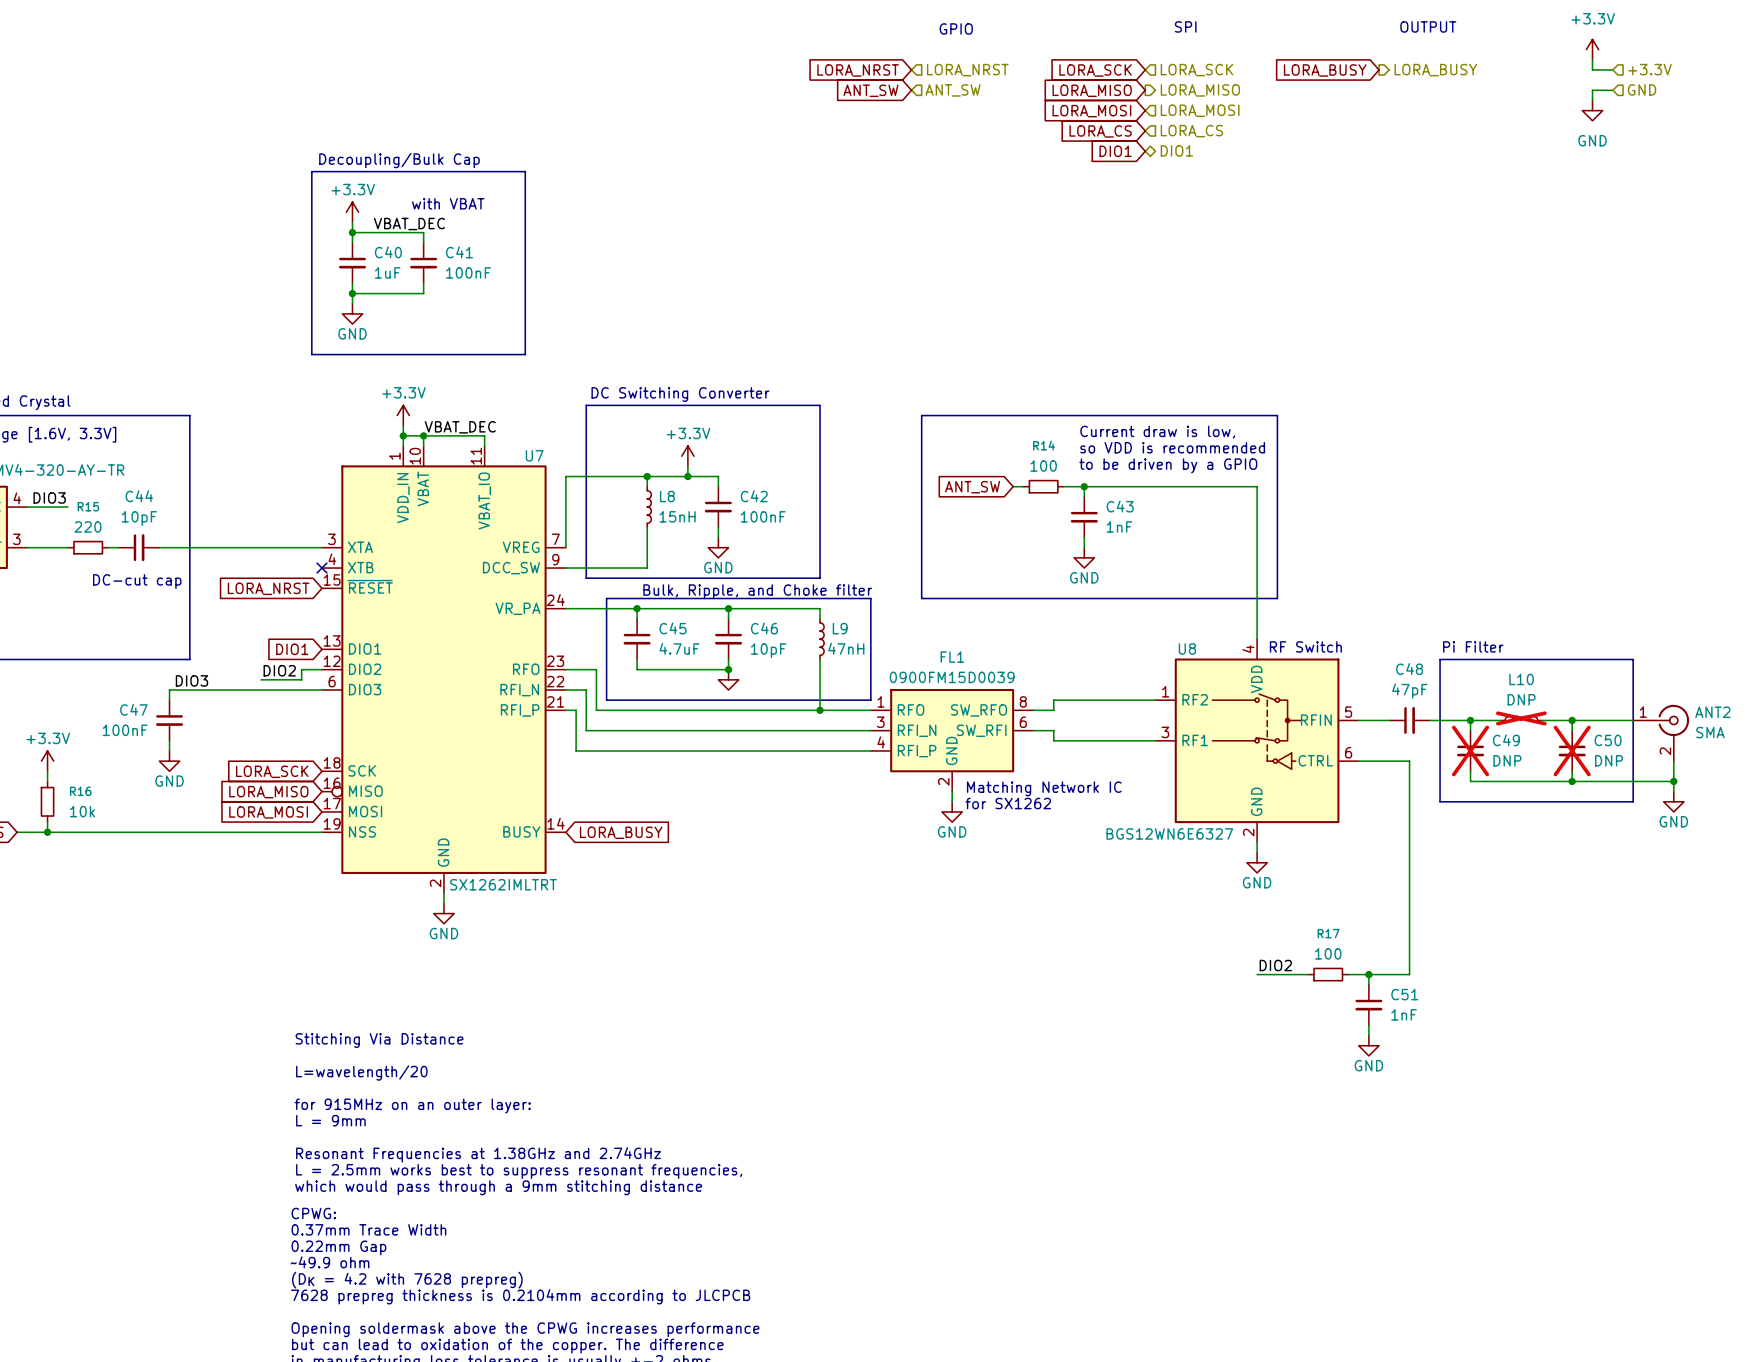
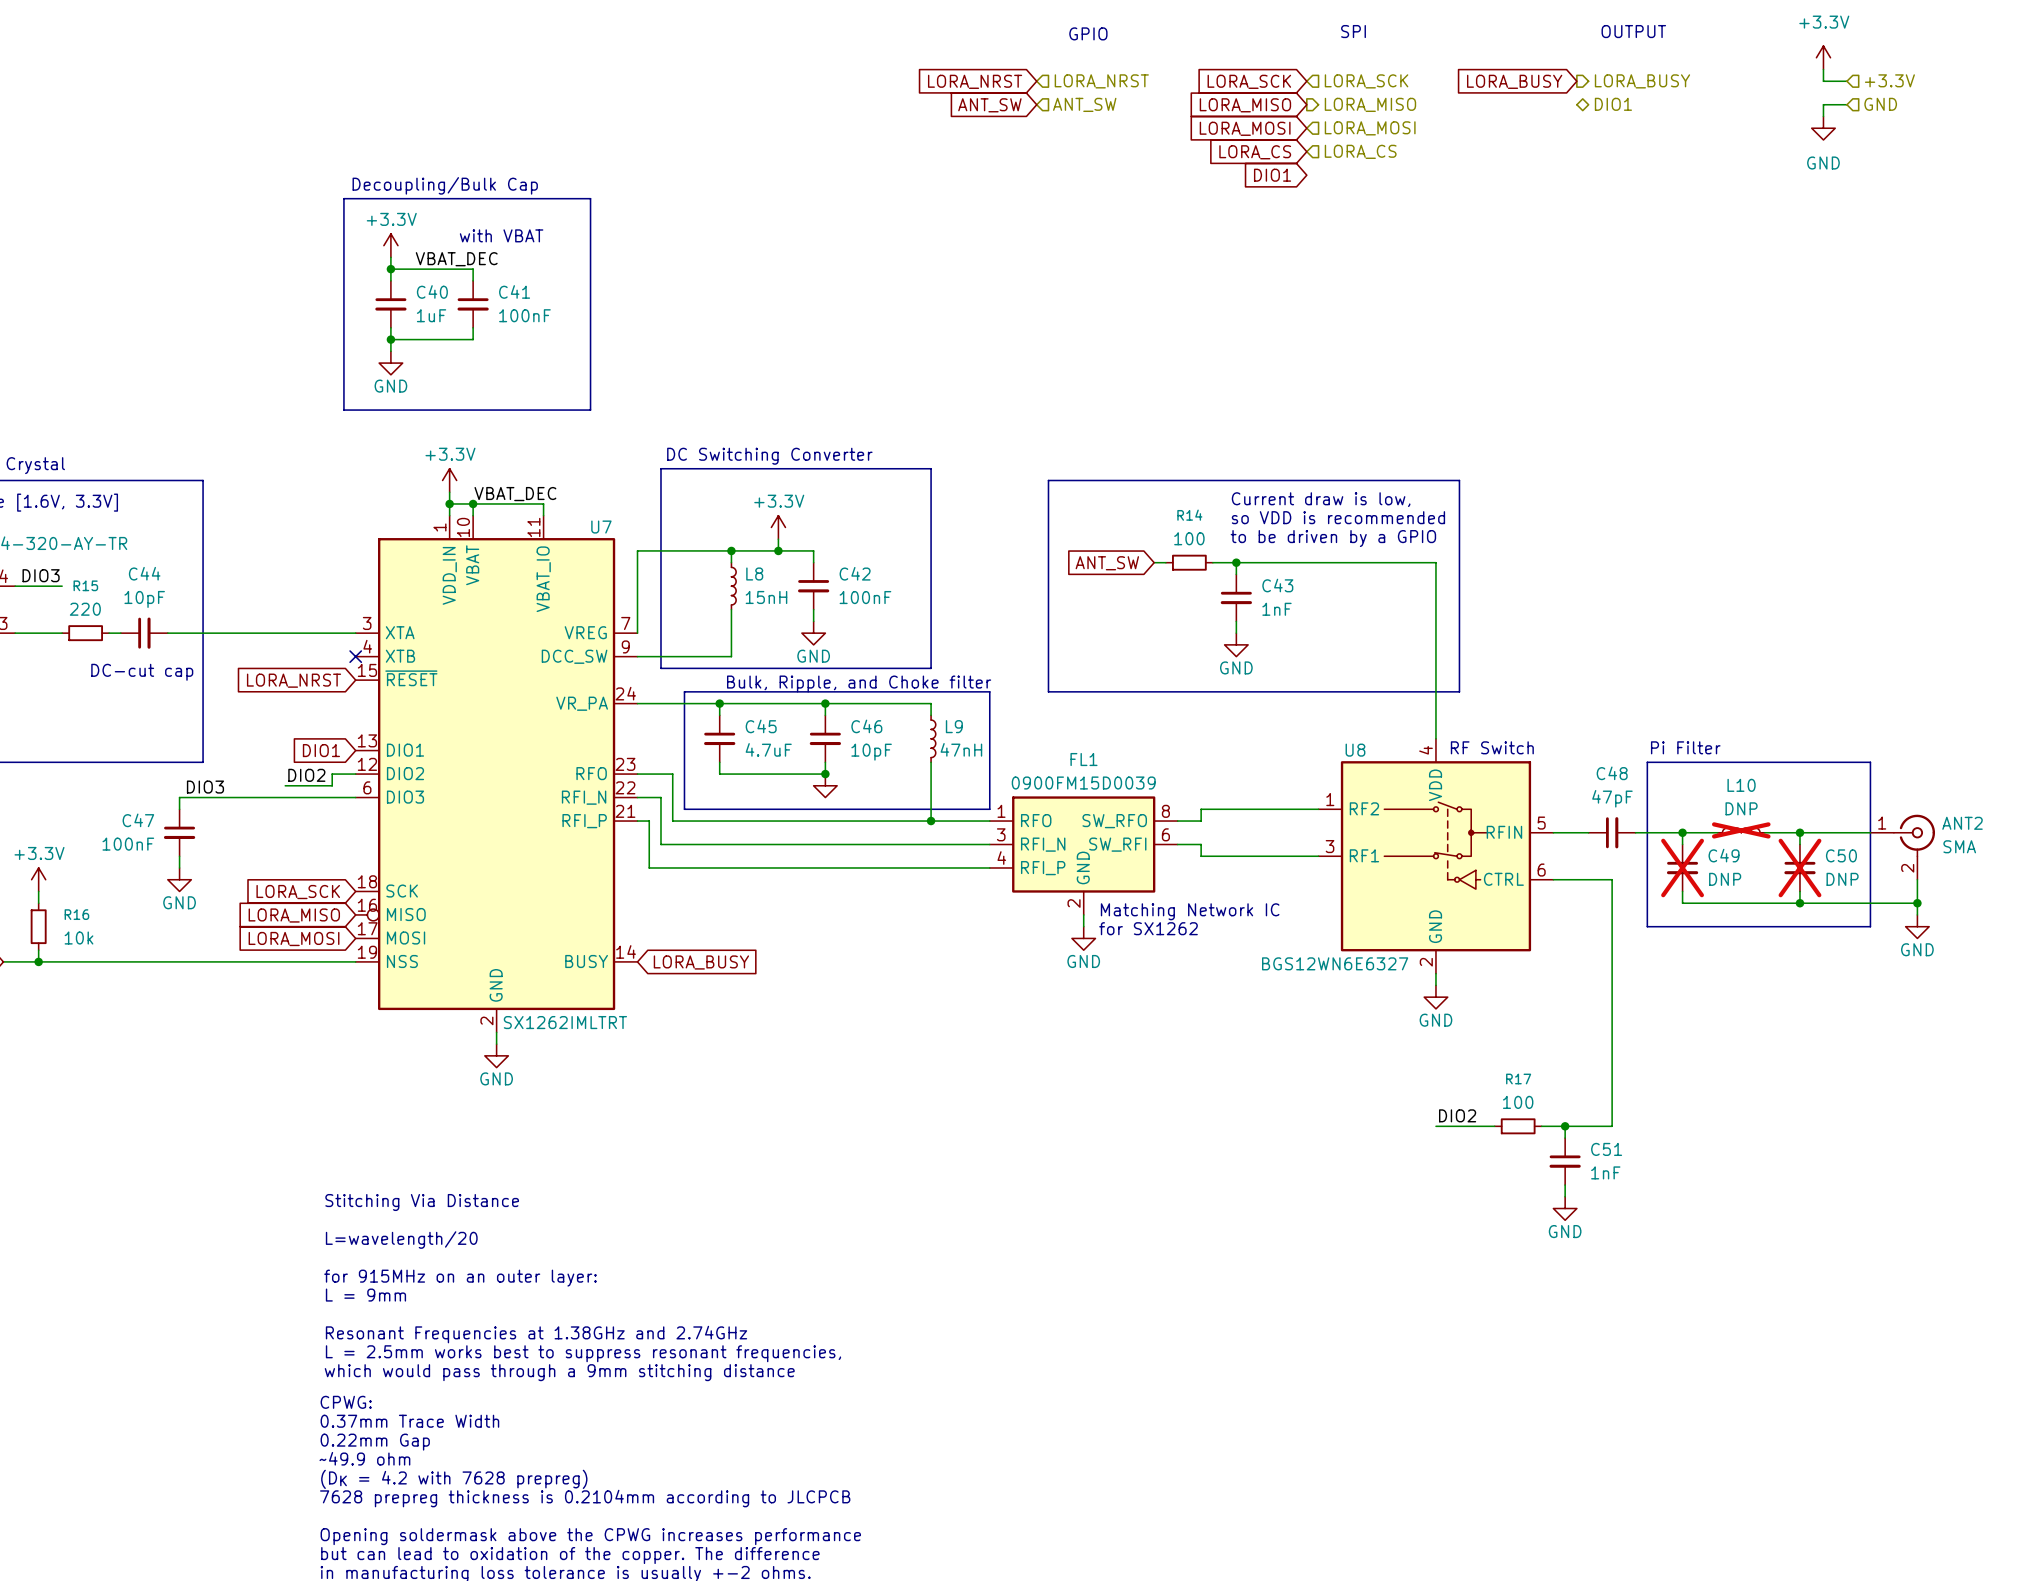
hierarchical label: none -> DIO1 (1613, 104)
hierarchical label: DIO1 (1176, 150) -> none

